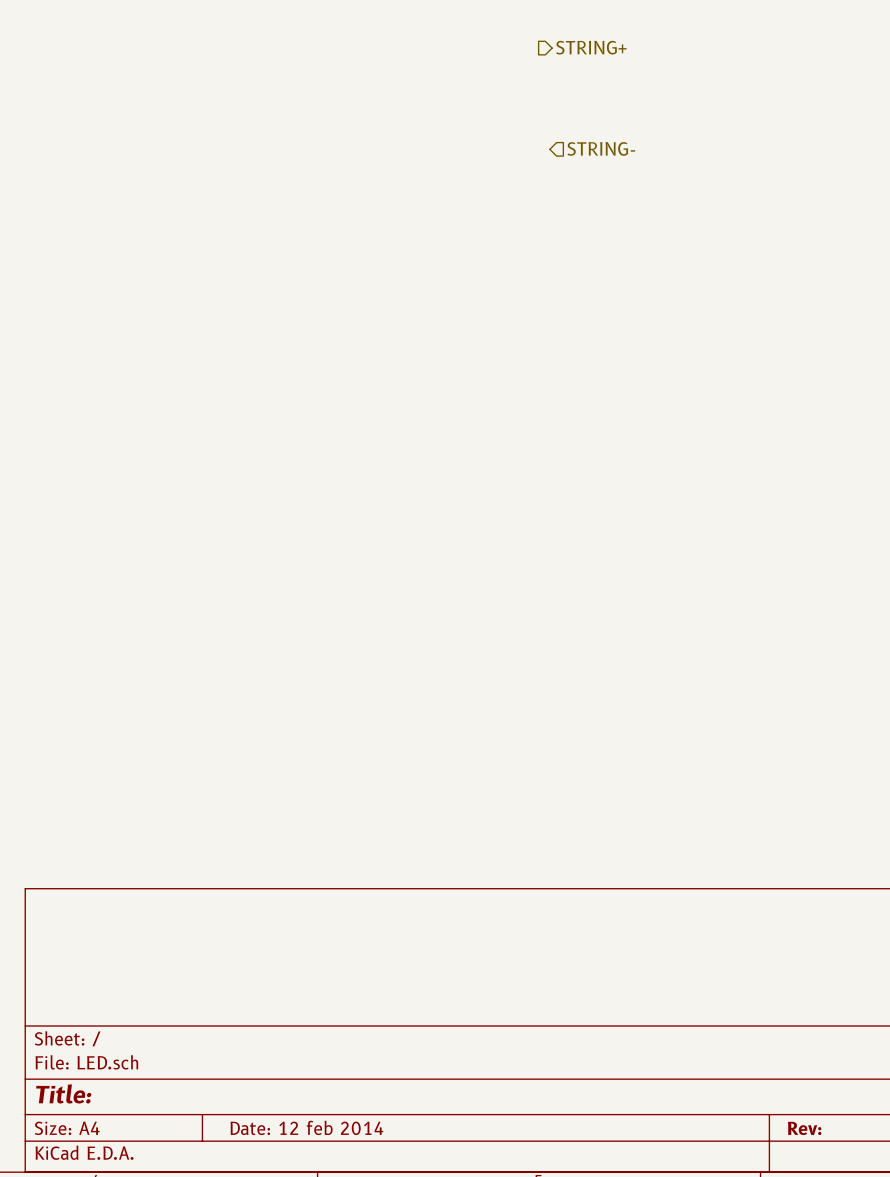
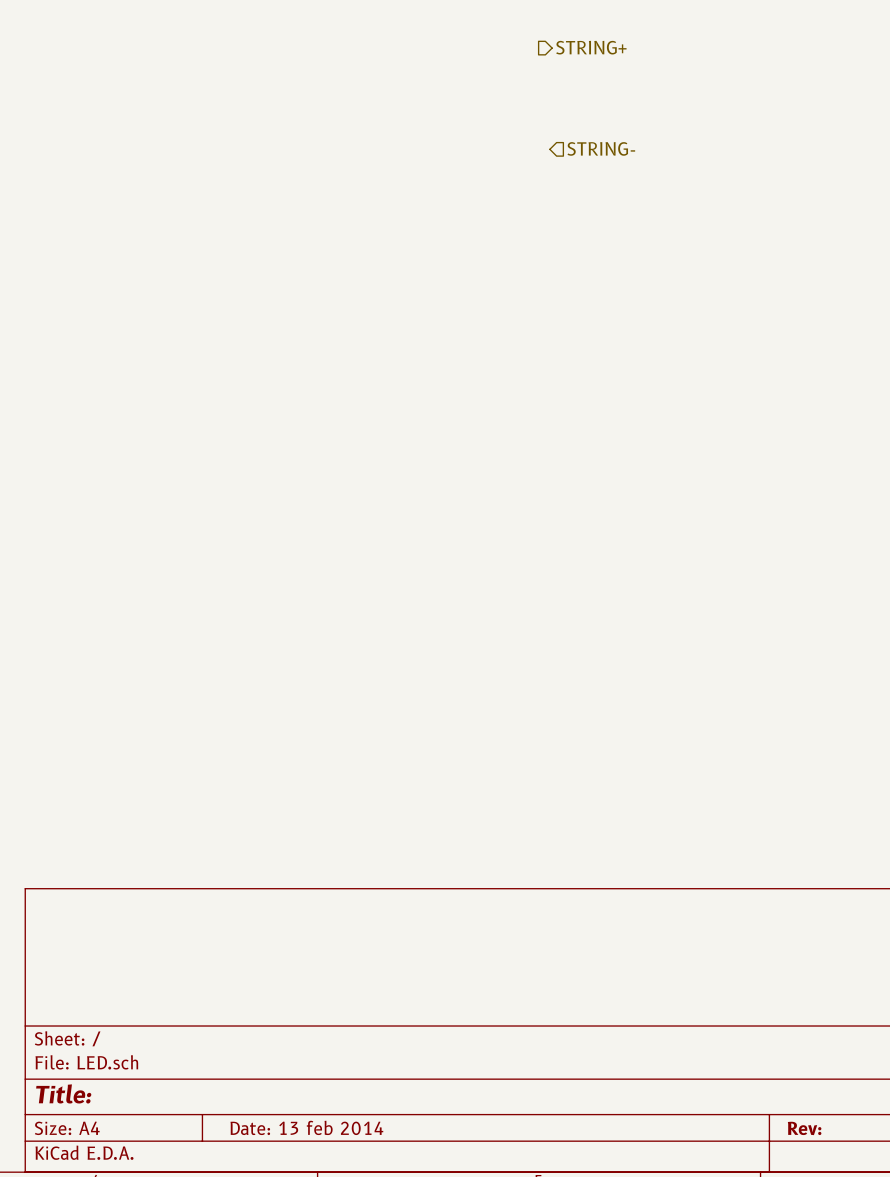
title block: Date: 12 feb 2014 (306, 1127) -> Date: 13 feb 2014 (306, 1127)

